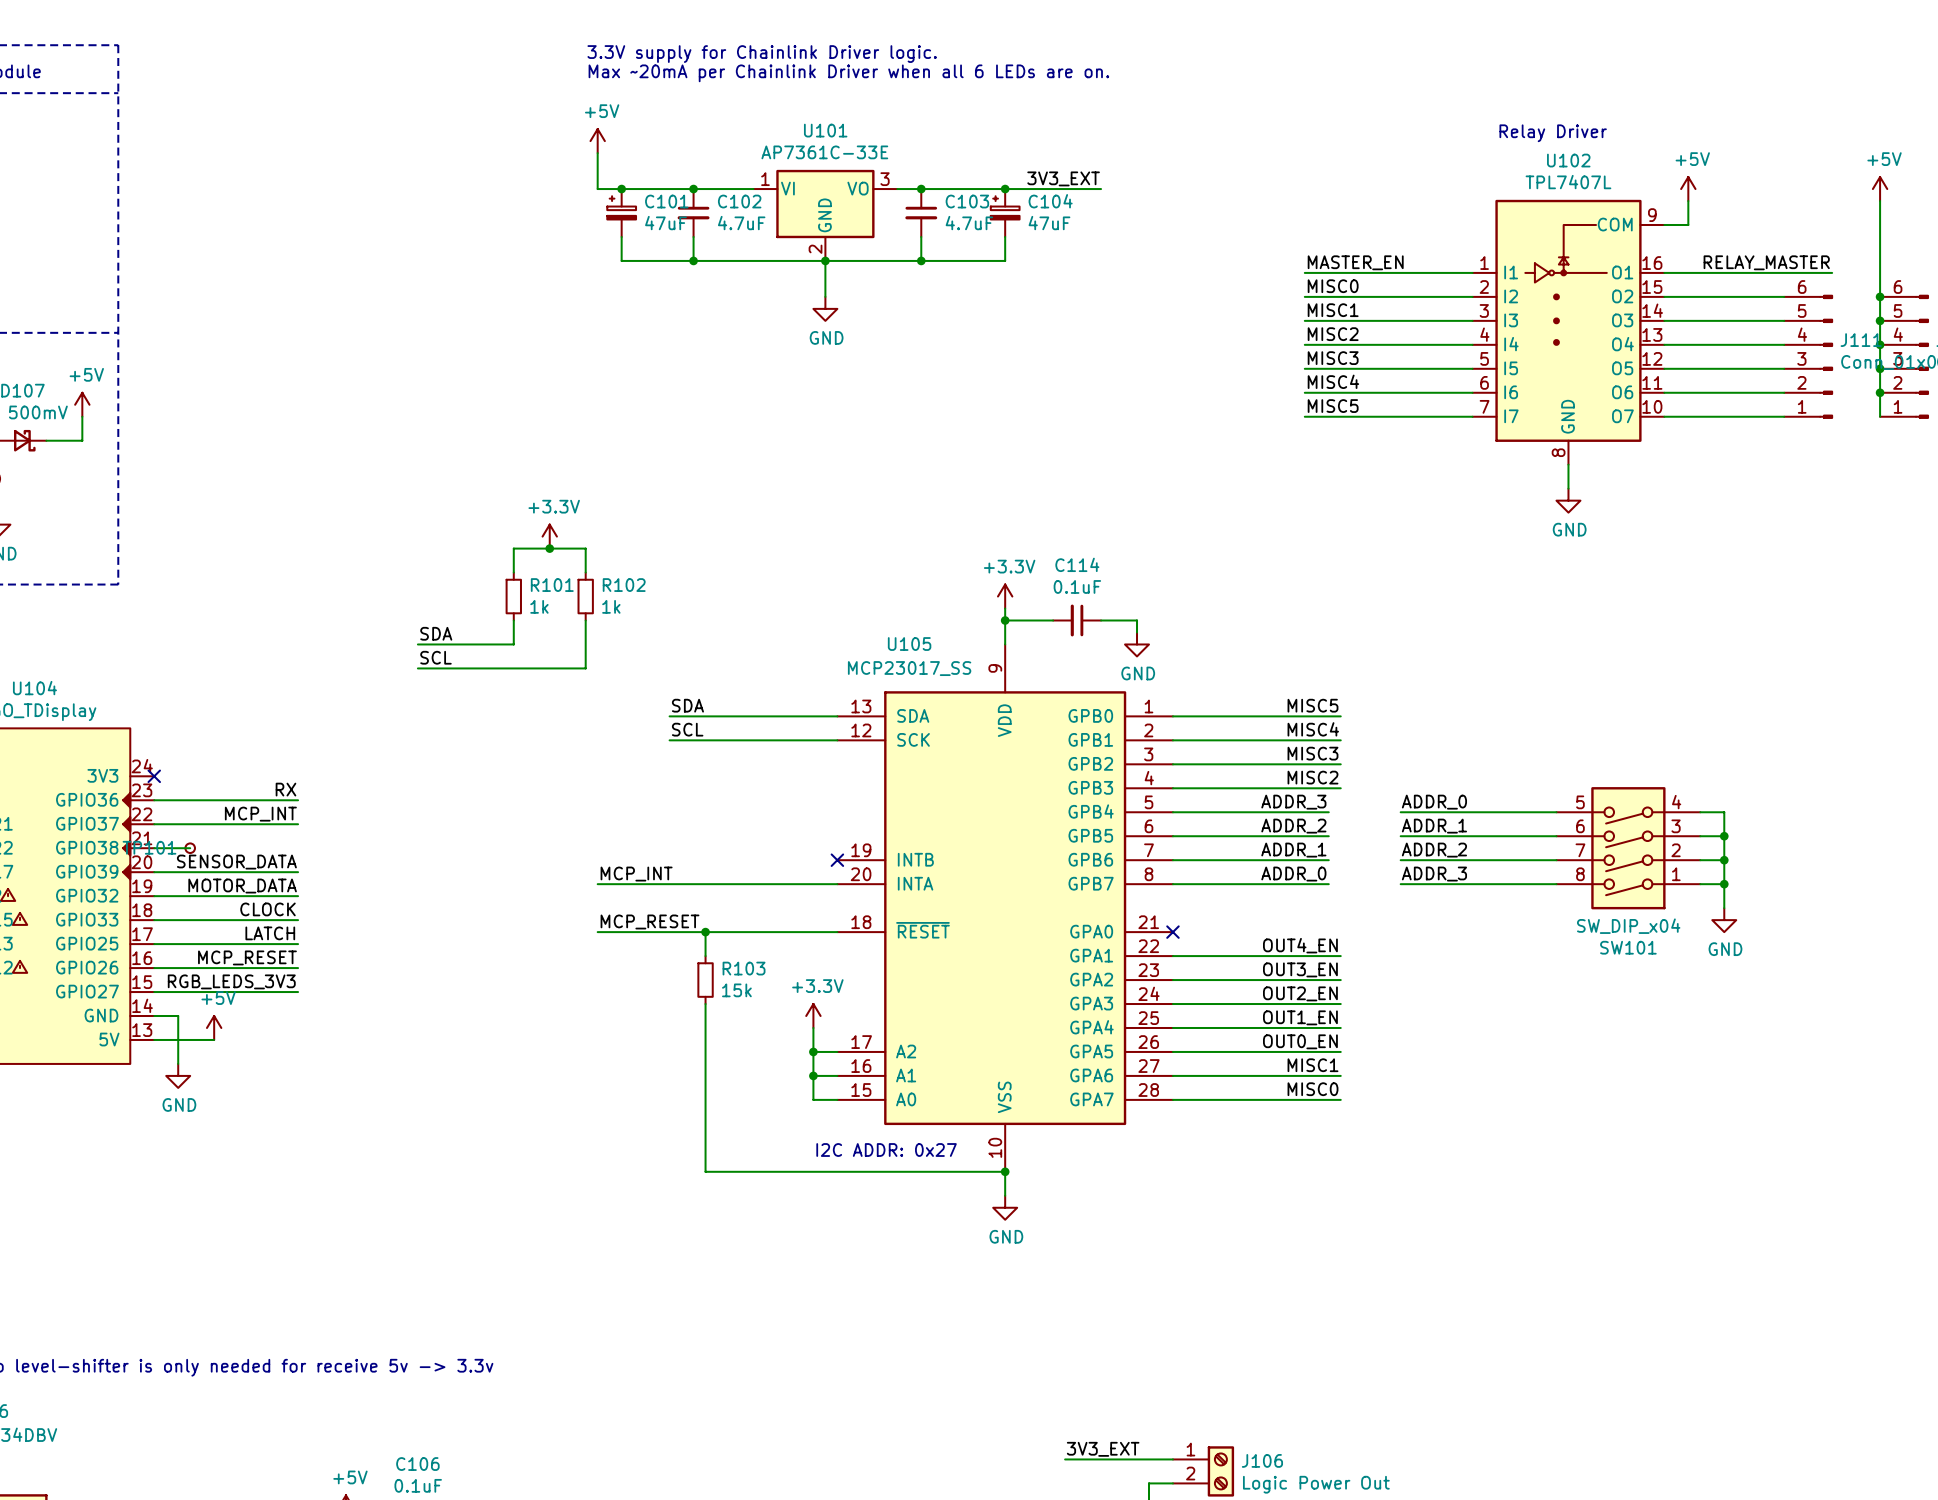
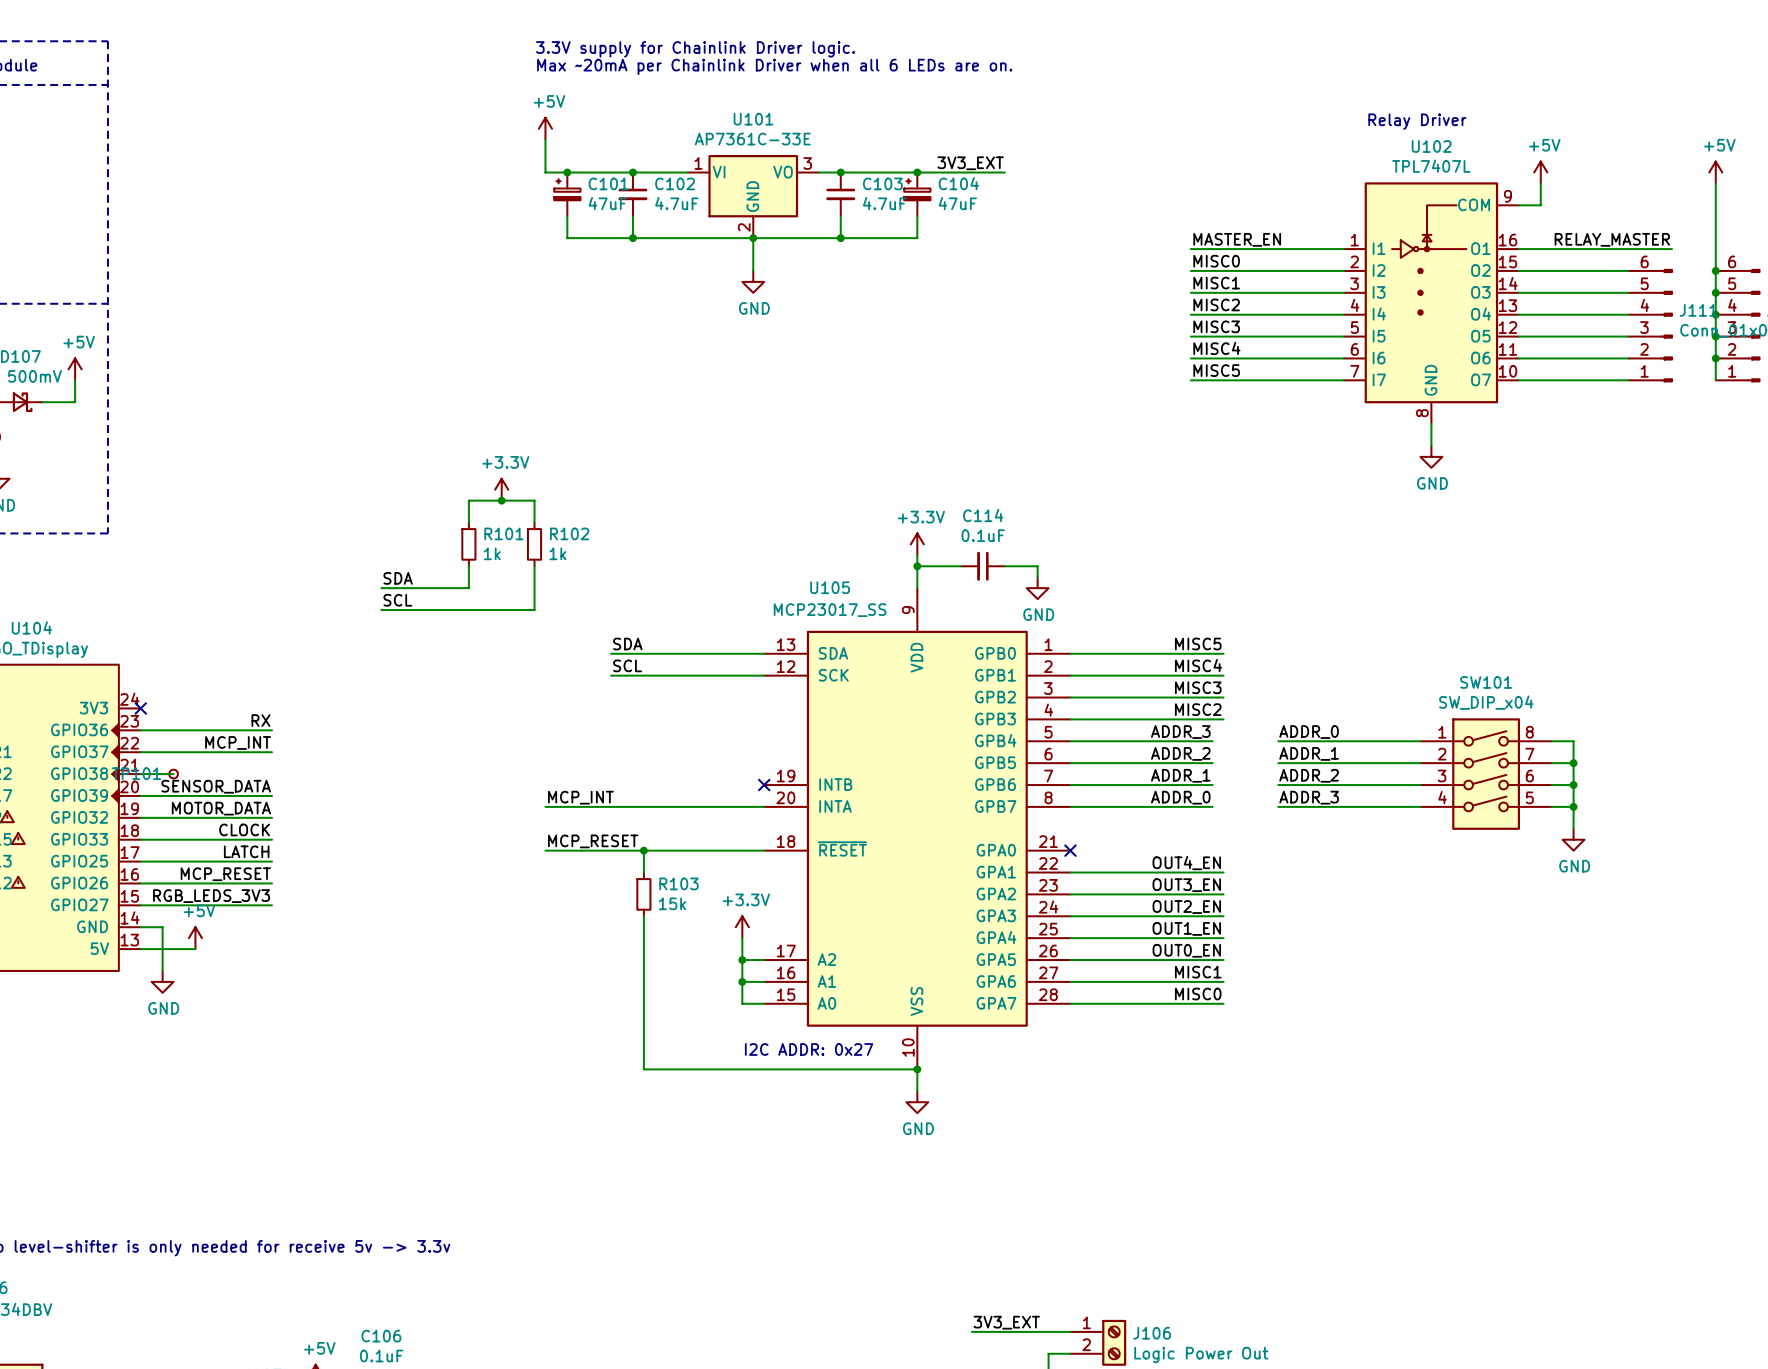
SW101 rotation: 0° (1628, 848) -> 180° (1486, 774)

